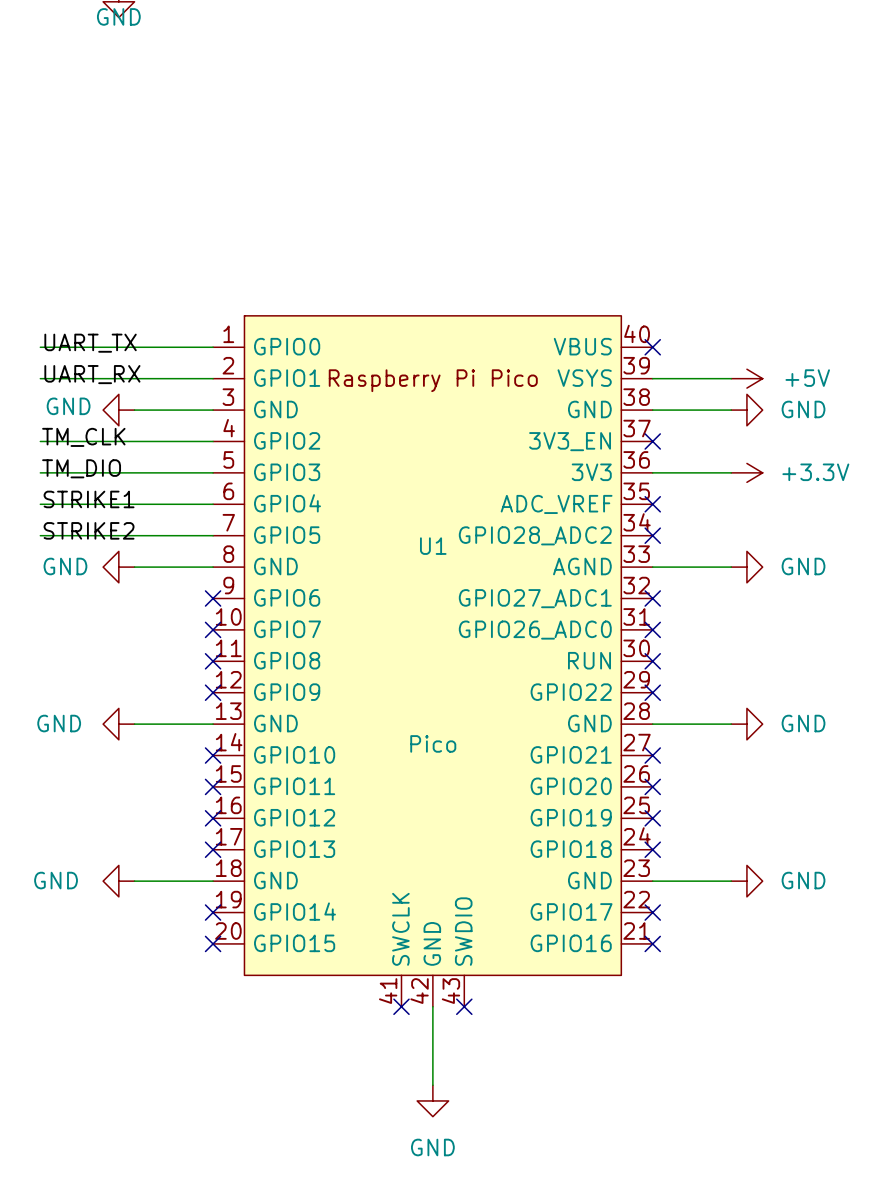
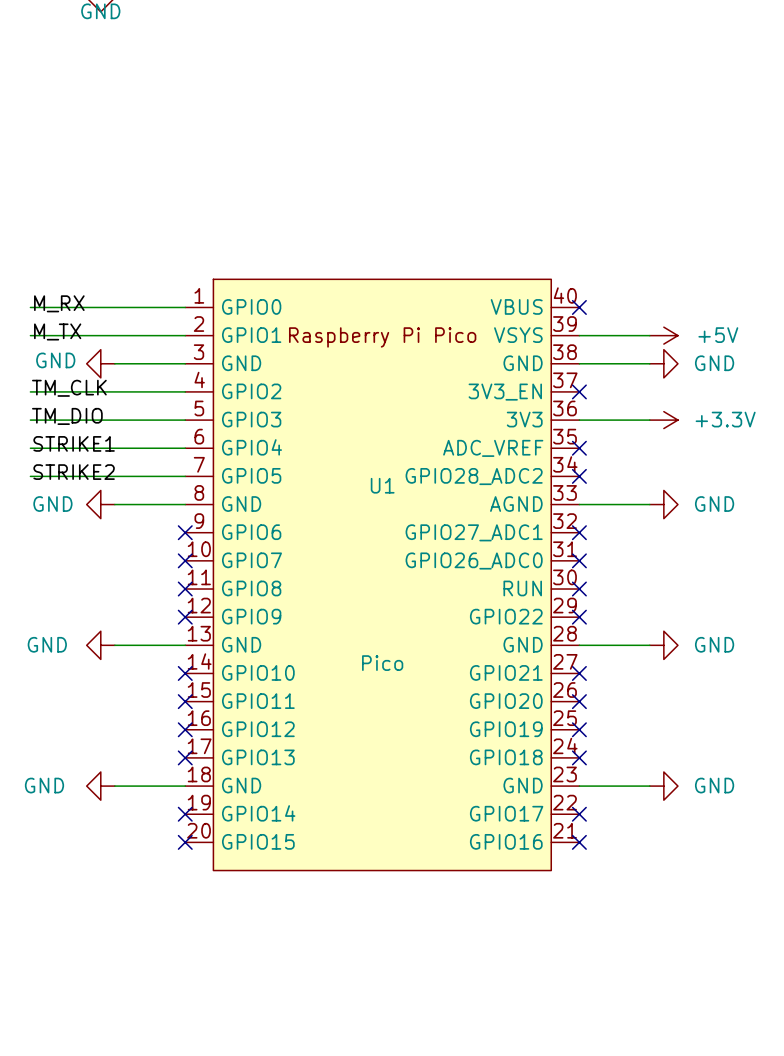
U1 symbol: [213, 315, 653, 1007] -> [185, 279, 580, 871]
label: UART_TX (90, 343) -> M_RX (59, 303)
label: UART_RX (92, 374) -> M_TX (57, 331)
no-connect mark: (401, 1006) -> none
wire: (432, 1006) (432, 1085) -> none
no-connect mark: (464, 1006) -> none
power symbol: GND (432, 1100) -> none

